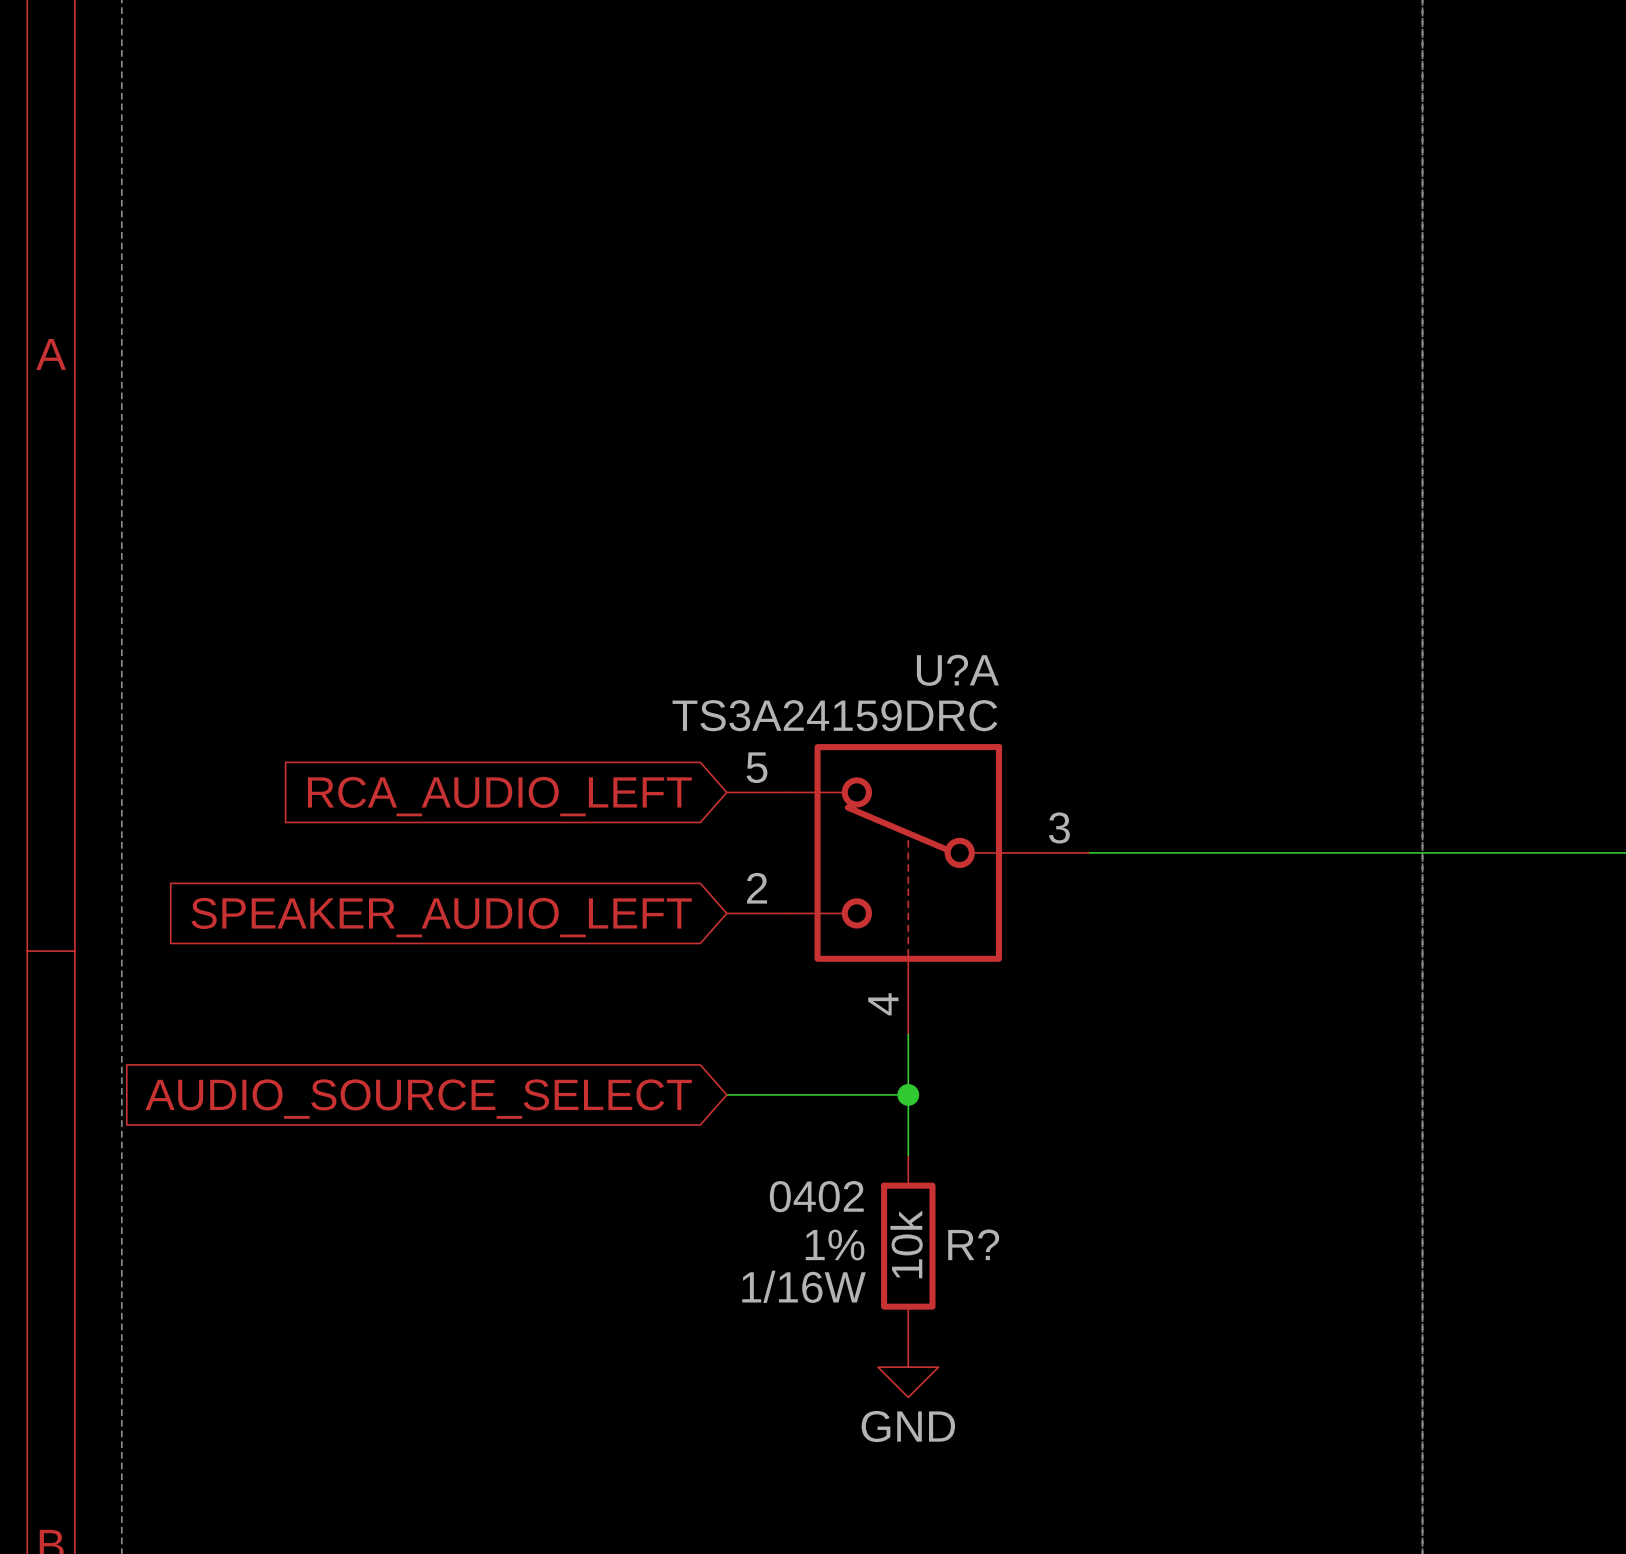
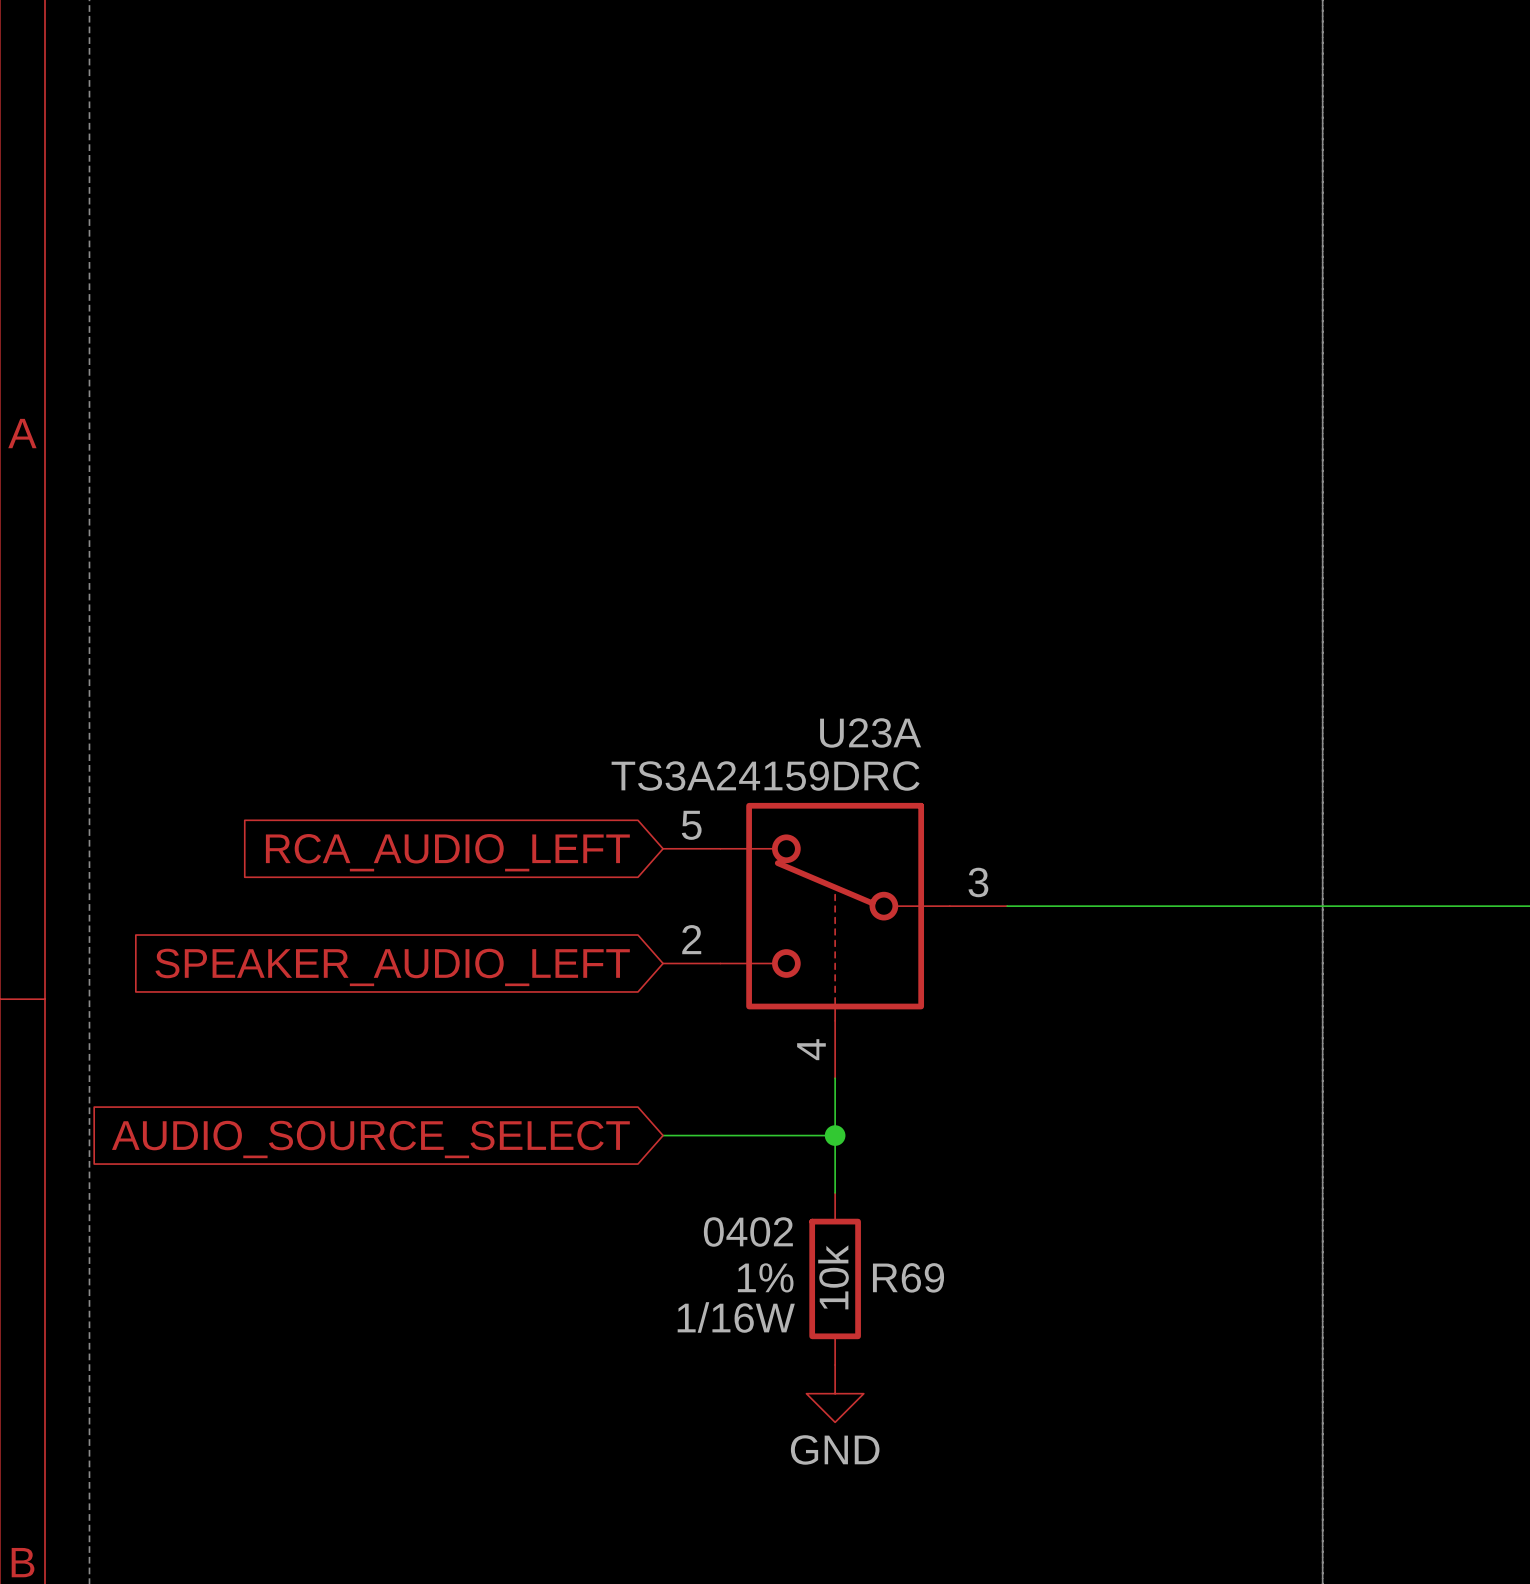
U?A name: U?A (957, 670) -> U23A (870, 732)
R? name: R? (973, 1244) -> R69 (908, 1277)

